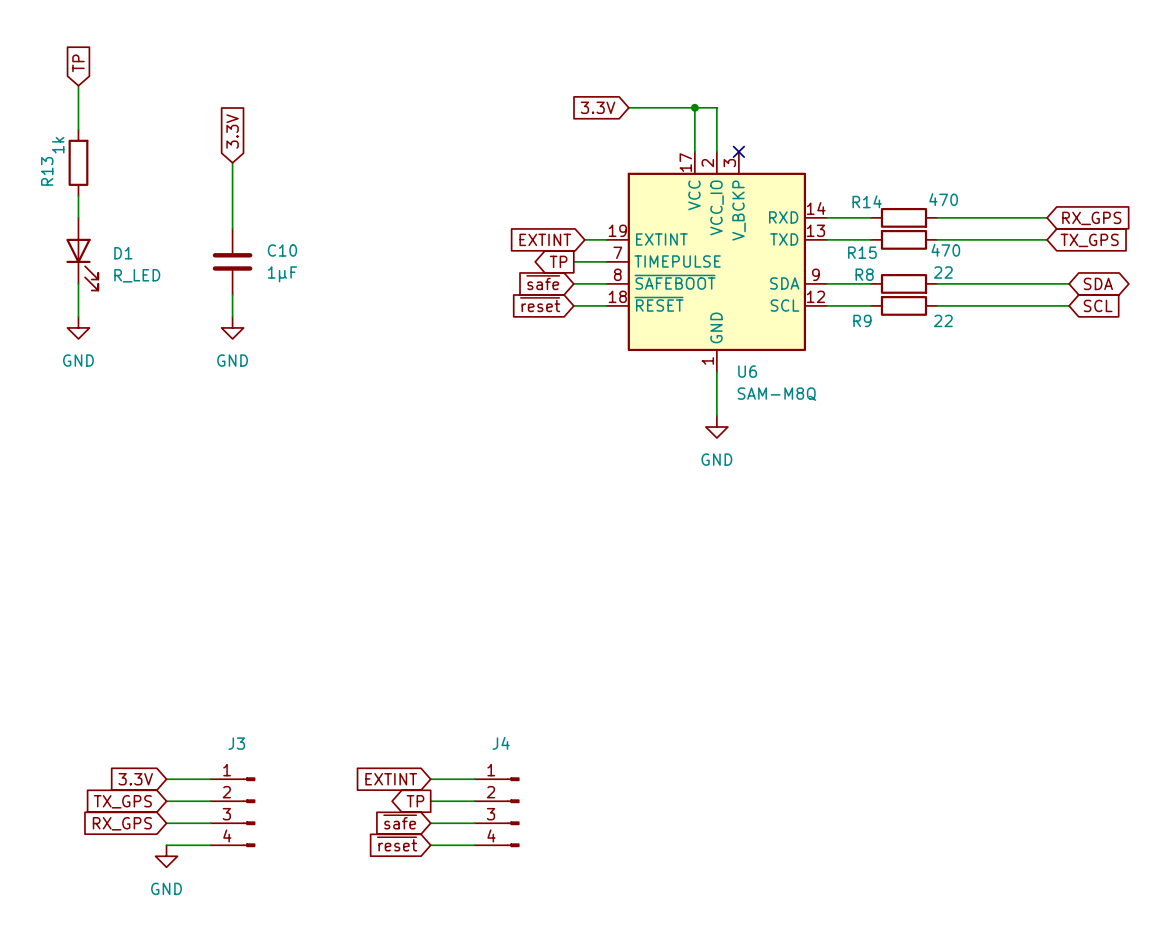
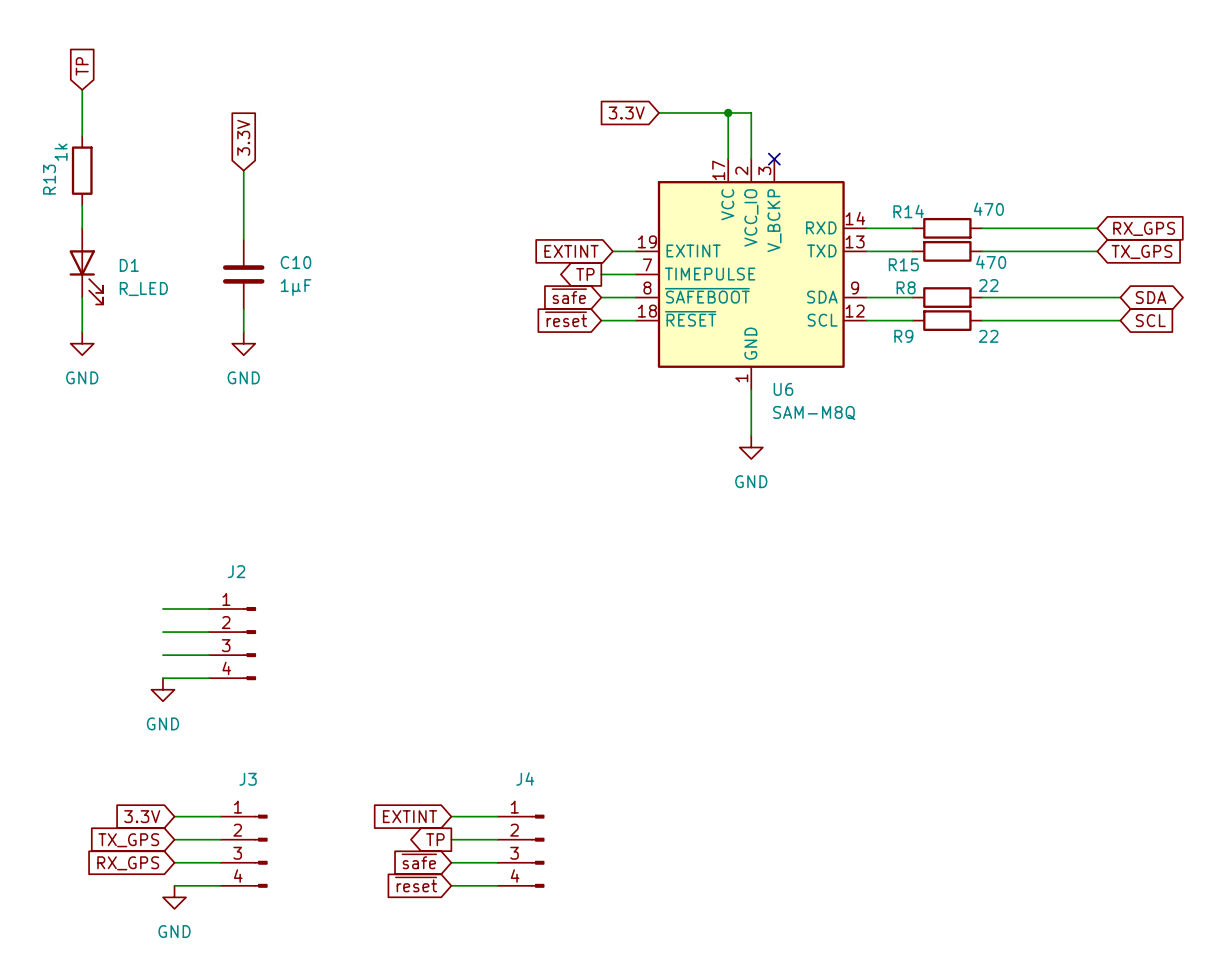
wire: none -> (162, 608) (209, 608)
wire: none -> (162, 632) (209, 632)
J2: none -> (232, 643)
wire: none -> (162, 655) (209, 655)
wire: none -> (162, 678) (209, 678)
power symbol: none -> GND (162, 689)

